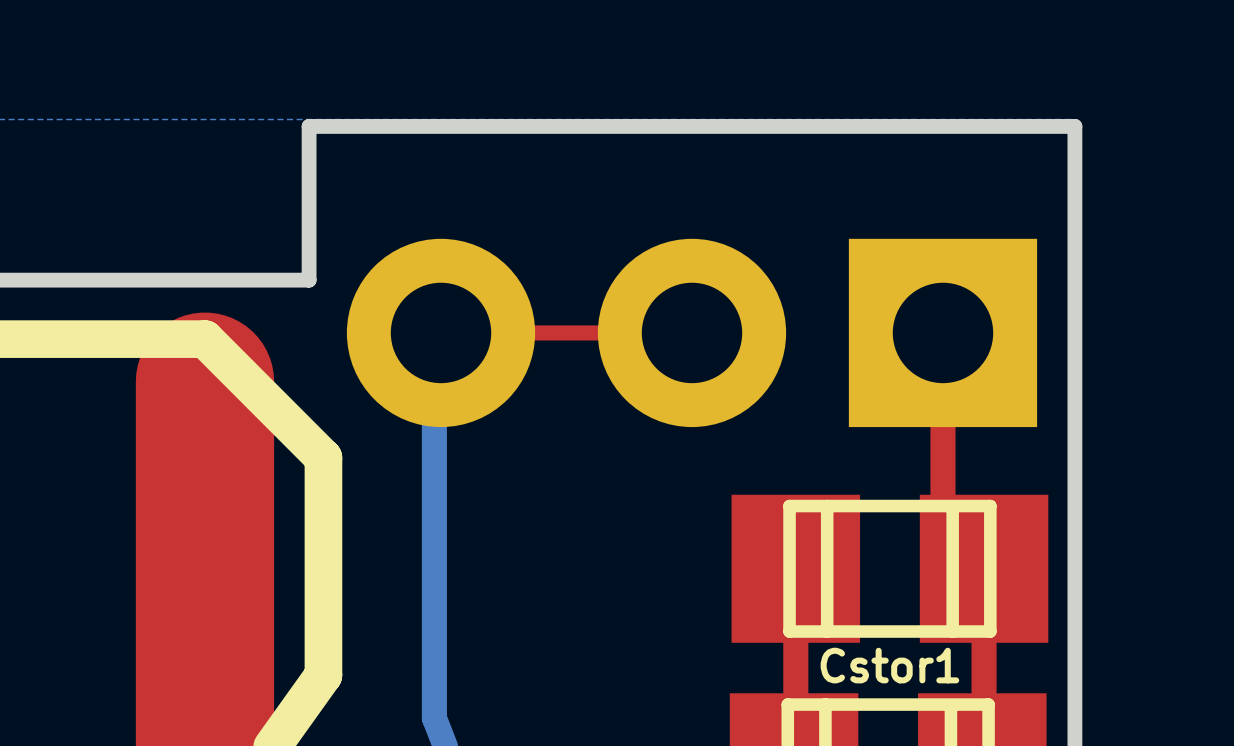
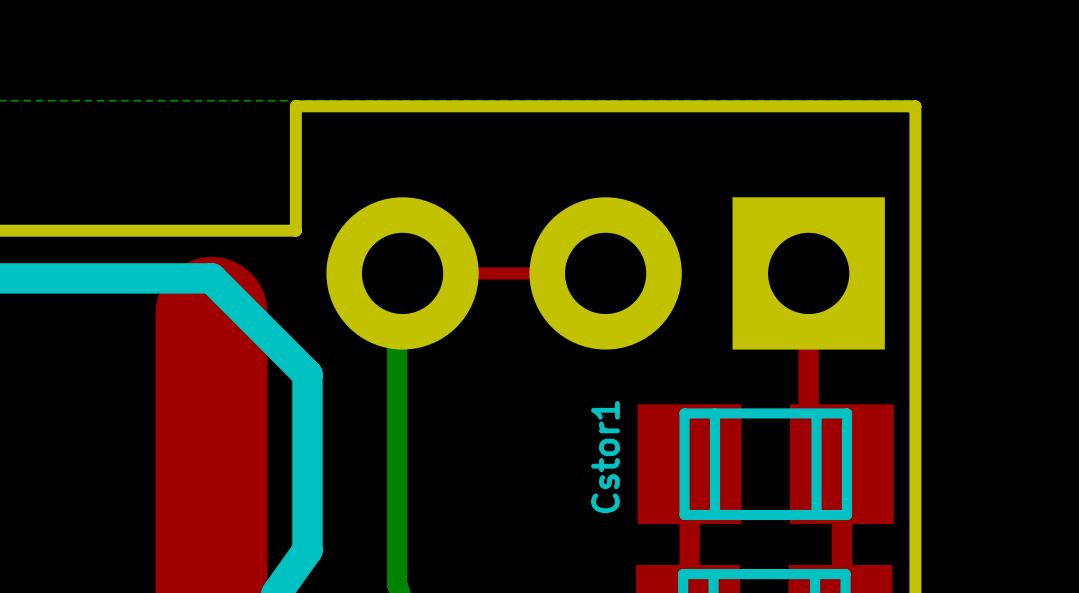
Cstor1 name rotation: 0° (889, 665) -> 90° counterclockwise (605, 457)
Cstor1 name position: Cstor1 (889, 665) -> Cstor1 (605, 457)

